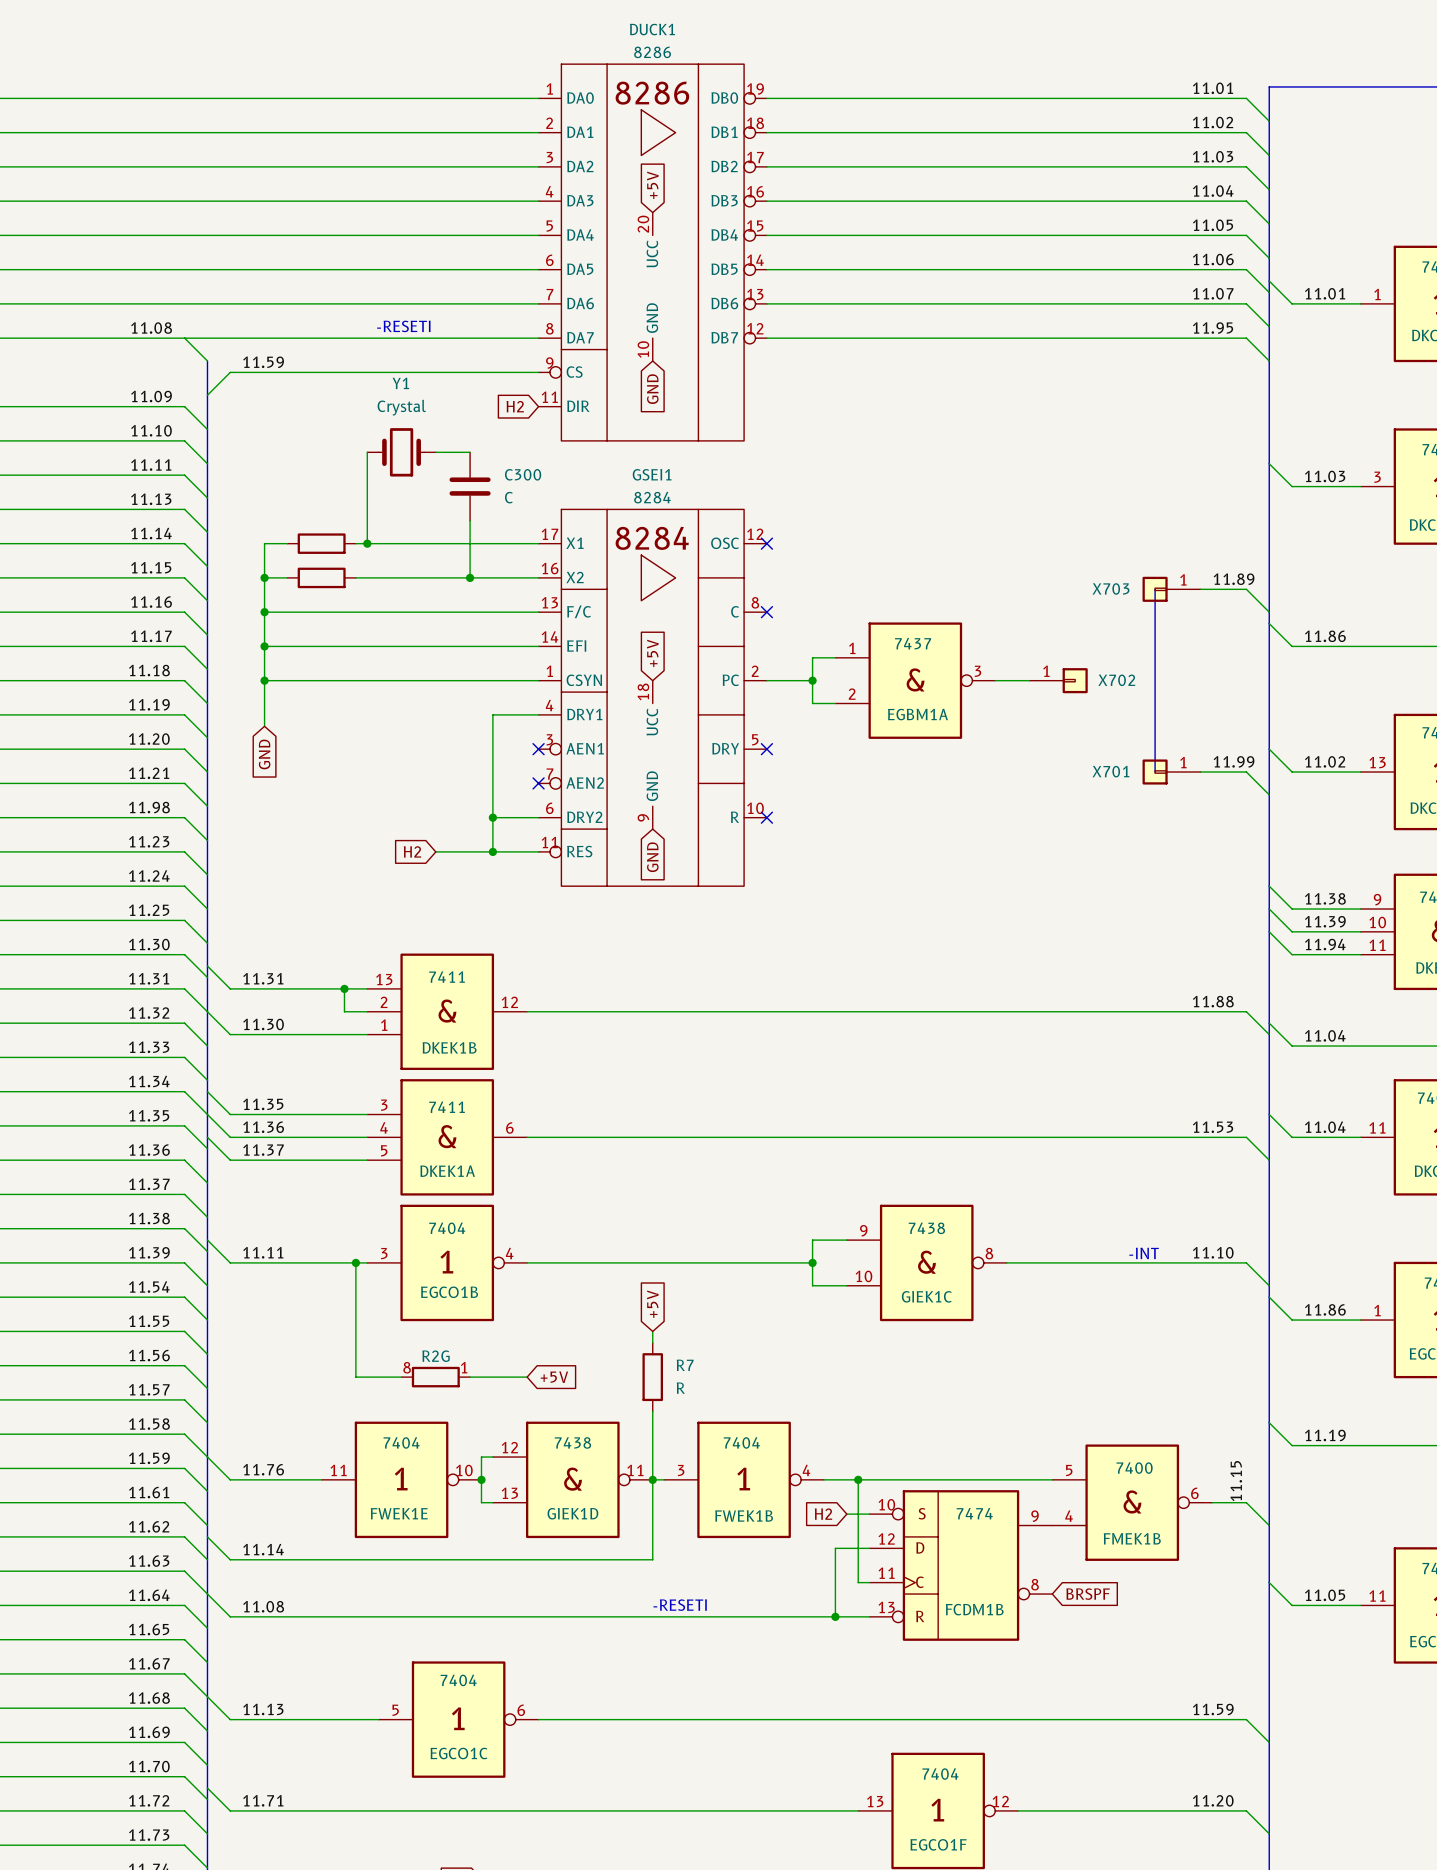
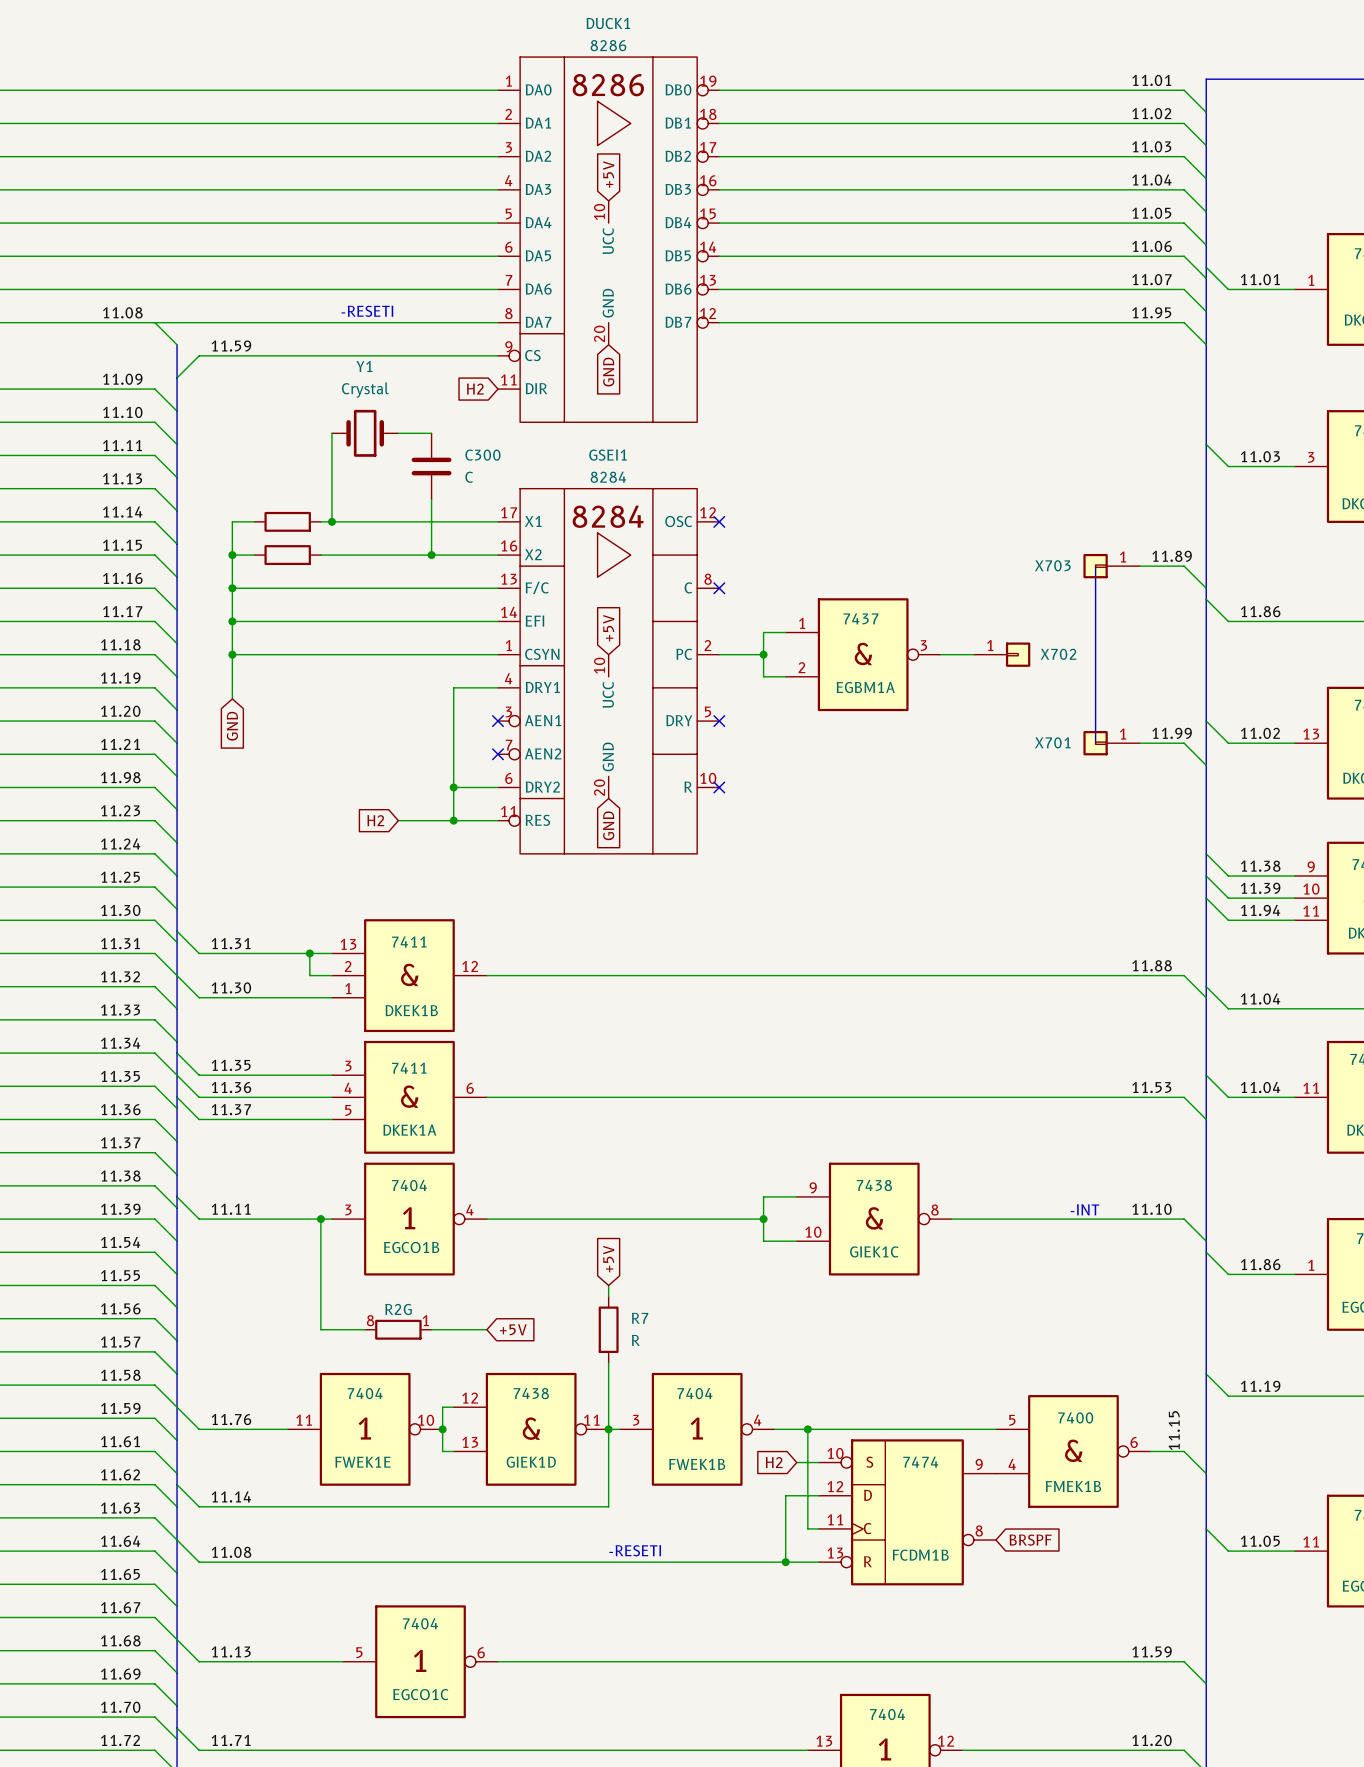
DUCK1 pin number: 20 (643, 224) -> 10 (599, 211)
DUCK1 pin number: 10 (643, 349) -> 20 (599, 333)
GSEI1 pin number: 18 (643, 691) -> 10 (599, 665)
GSEI1 pin number: 9 (643, 817) -> 20 (599, 787)

